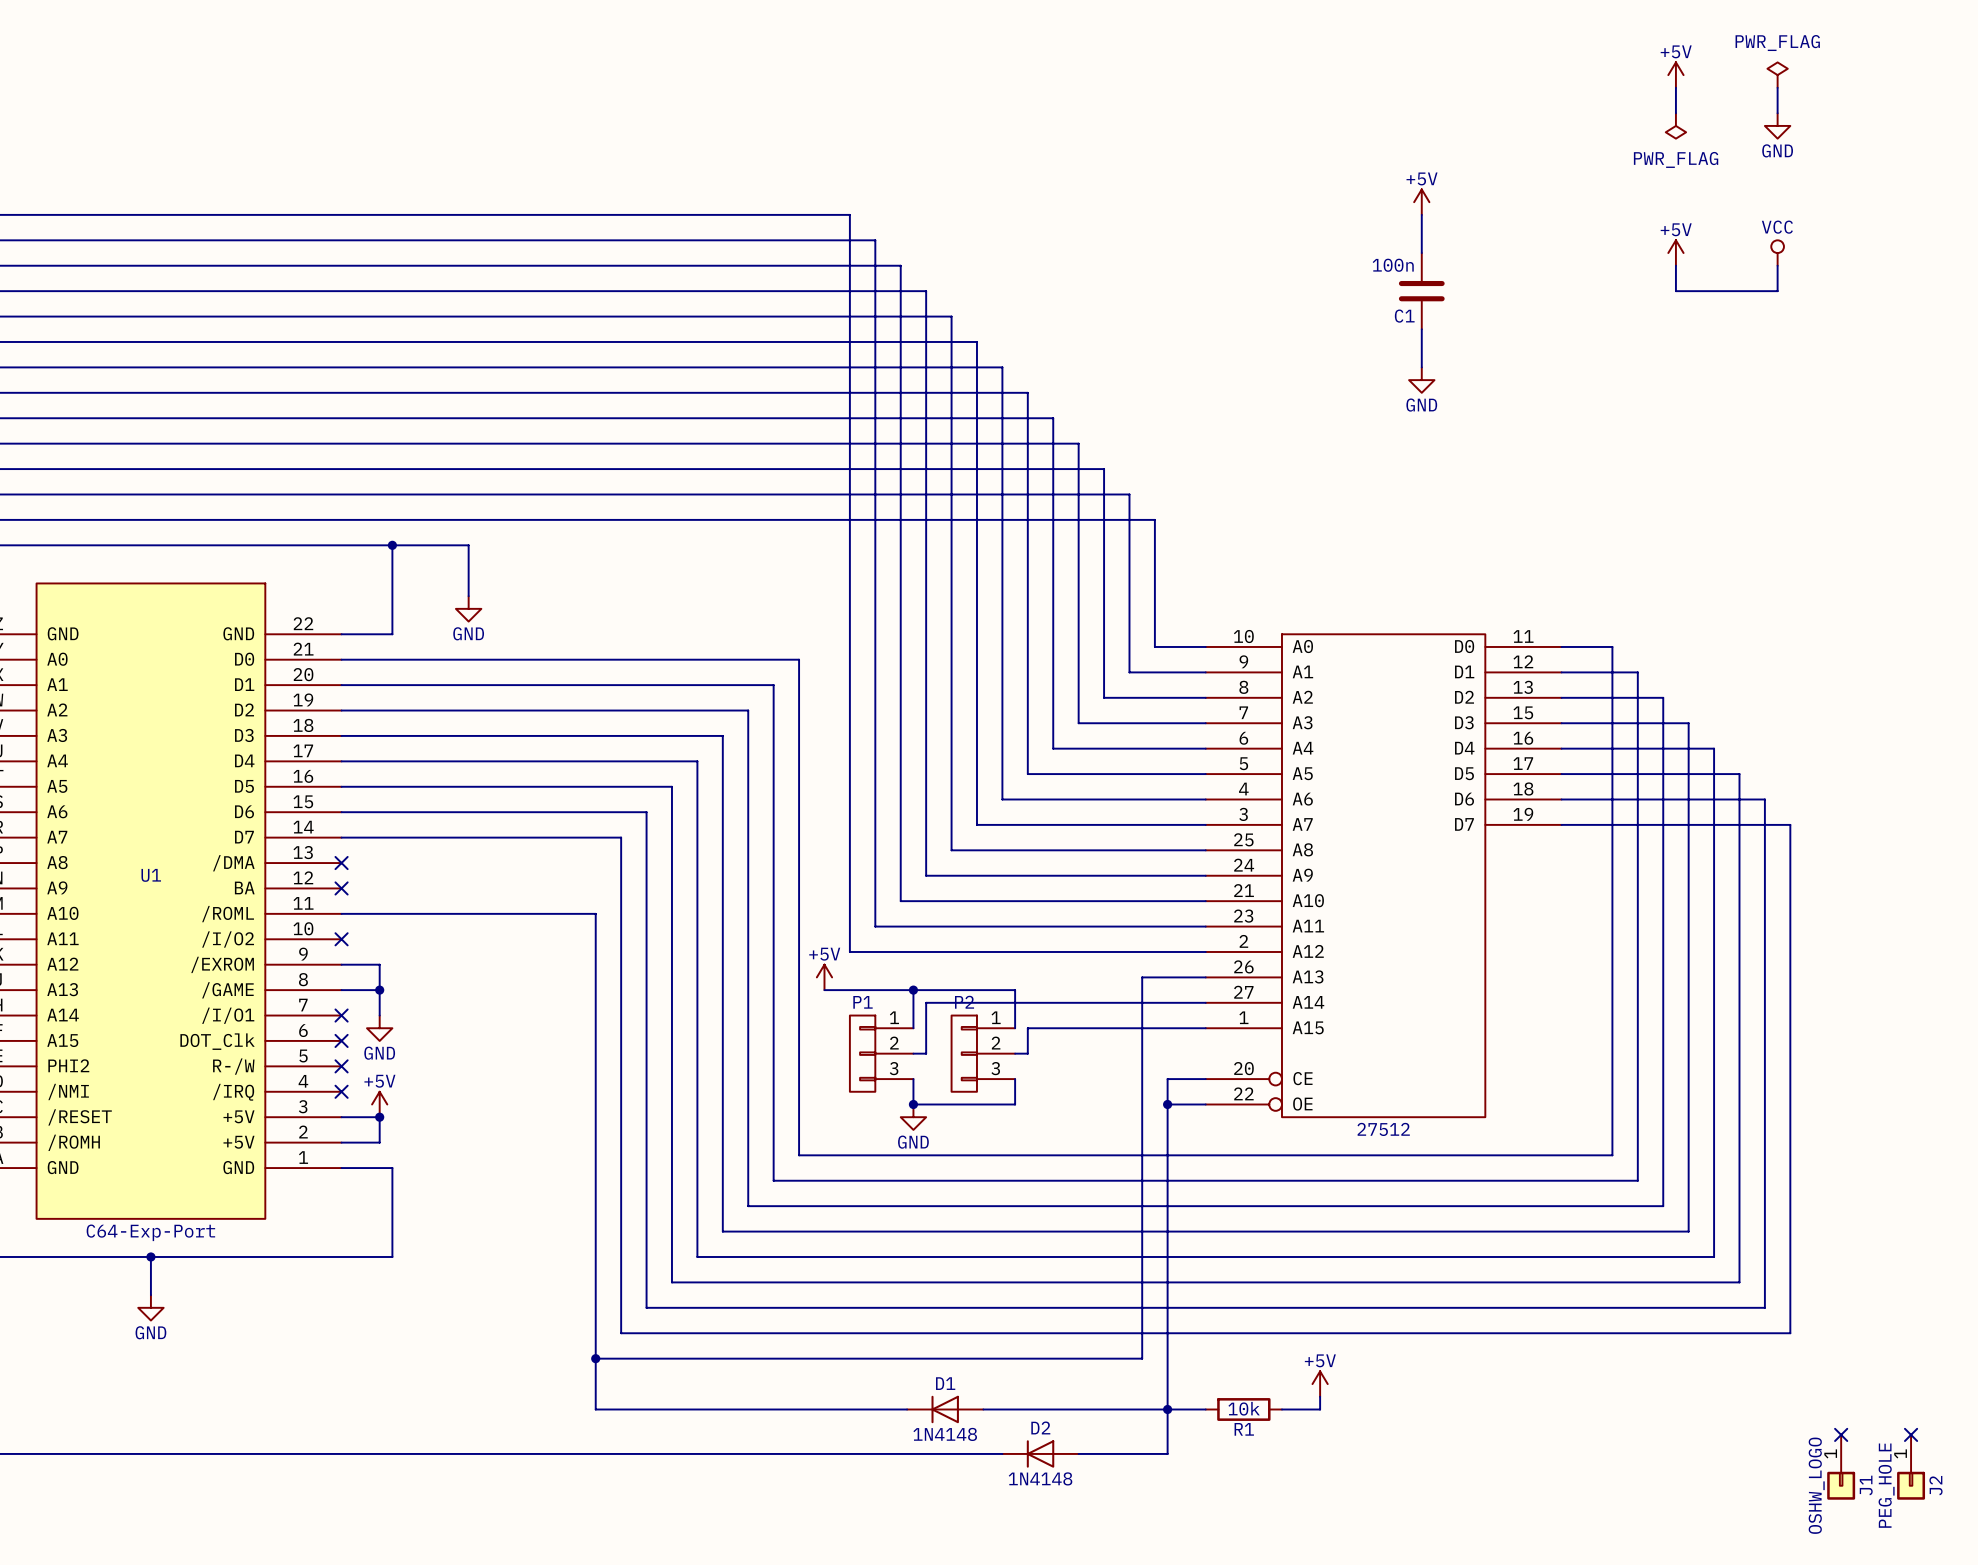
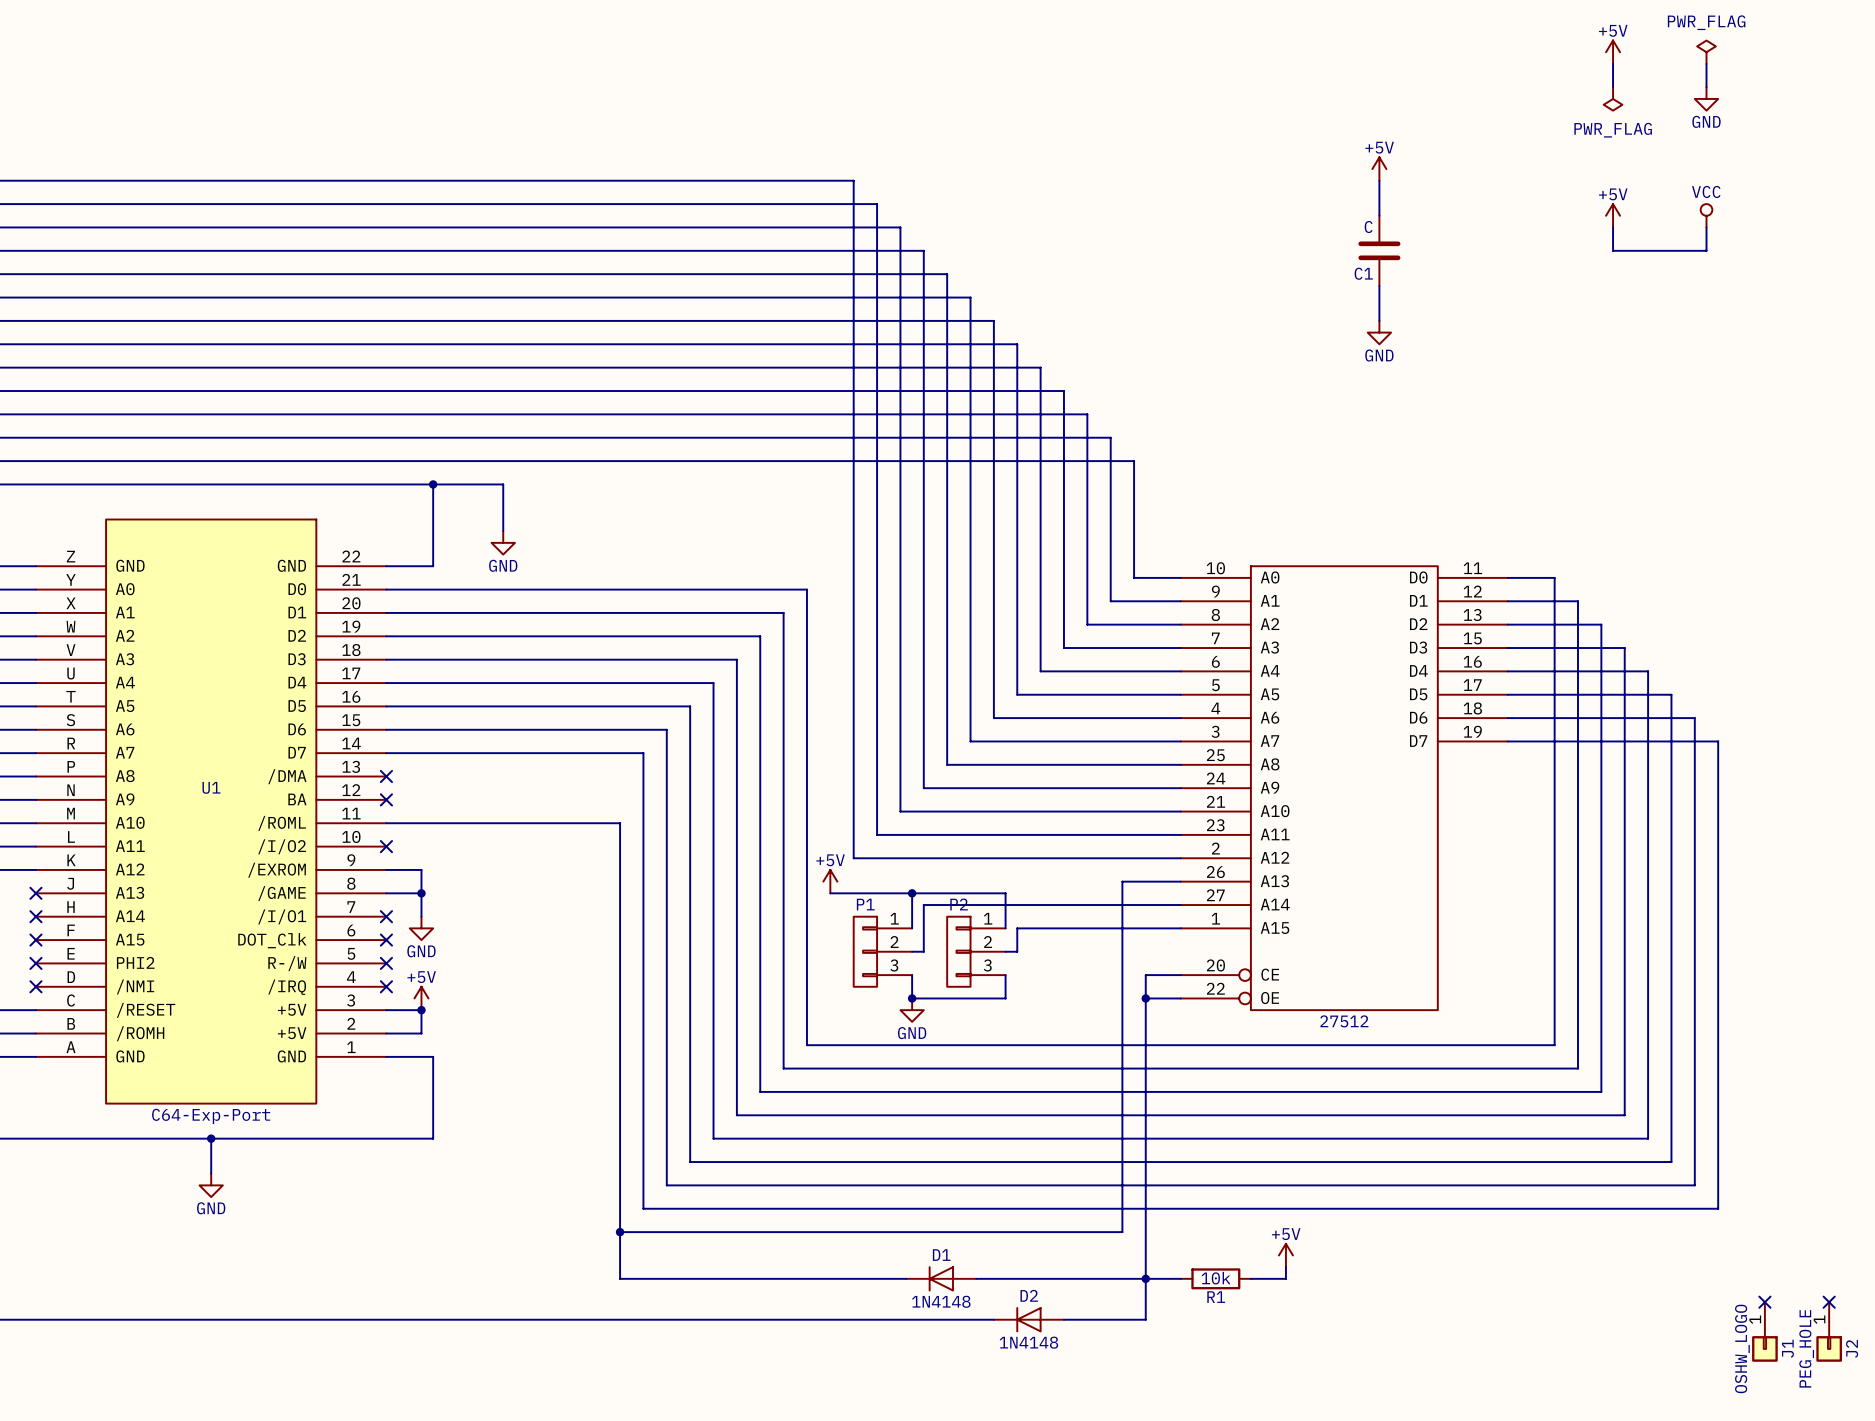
C1 value: 100n (1393, 265) -> C (1368, 227)

